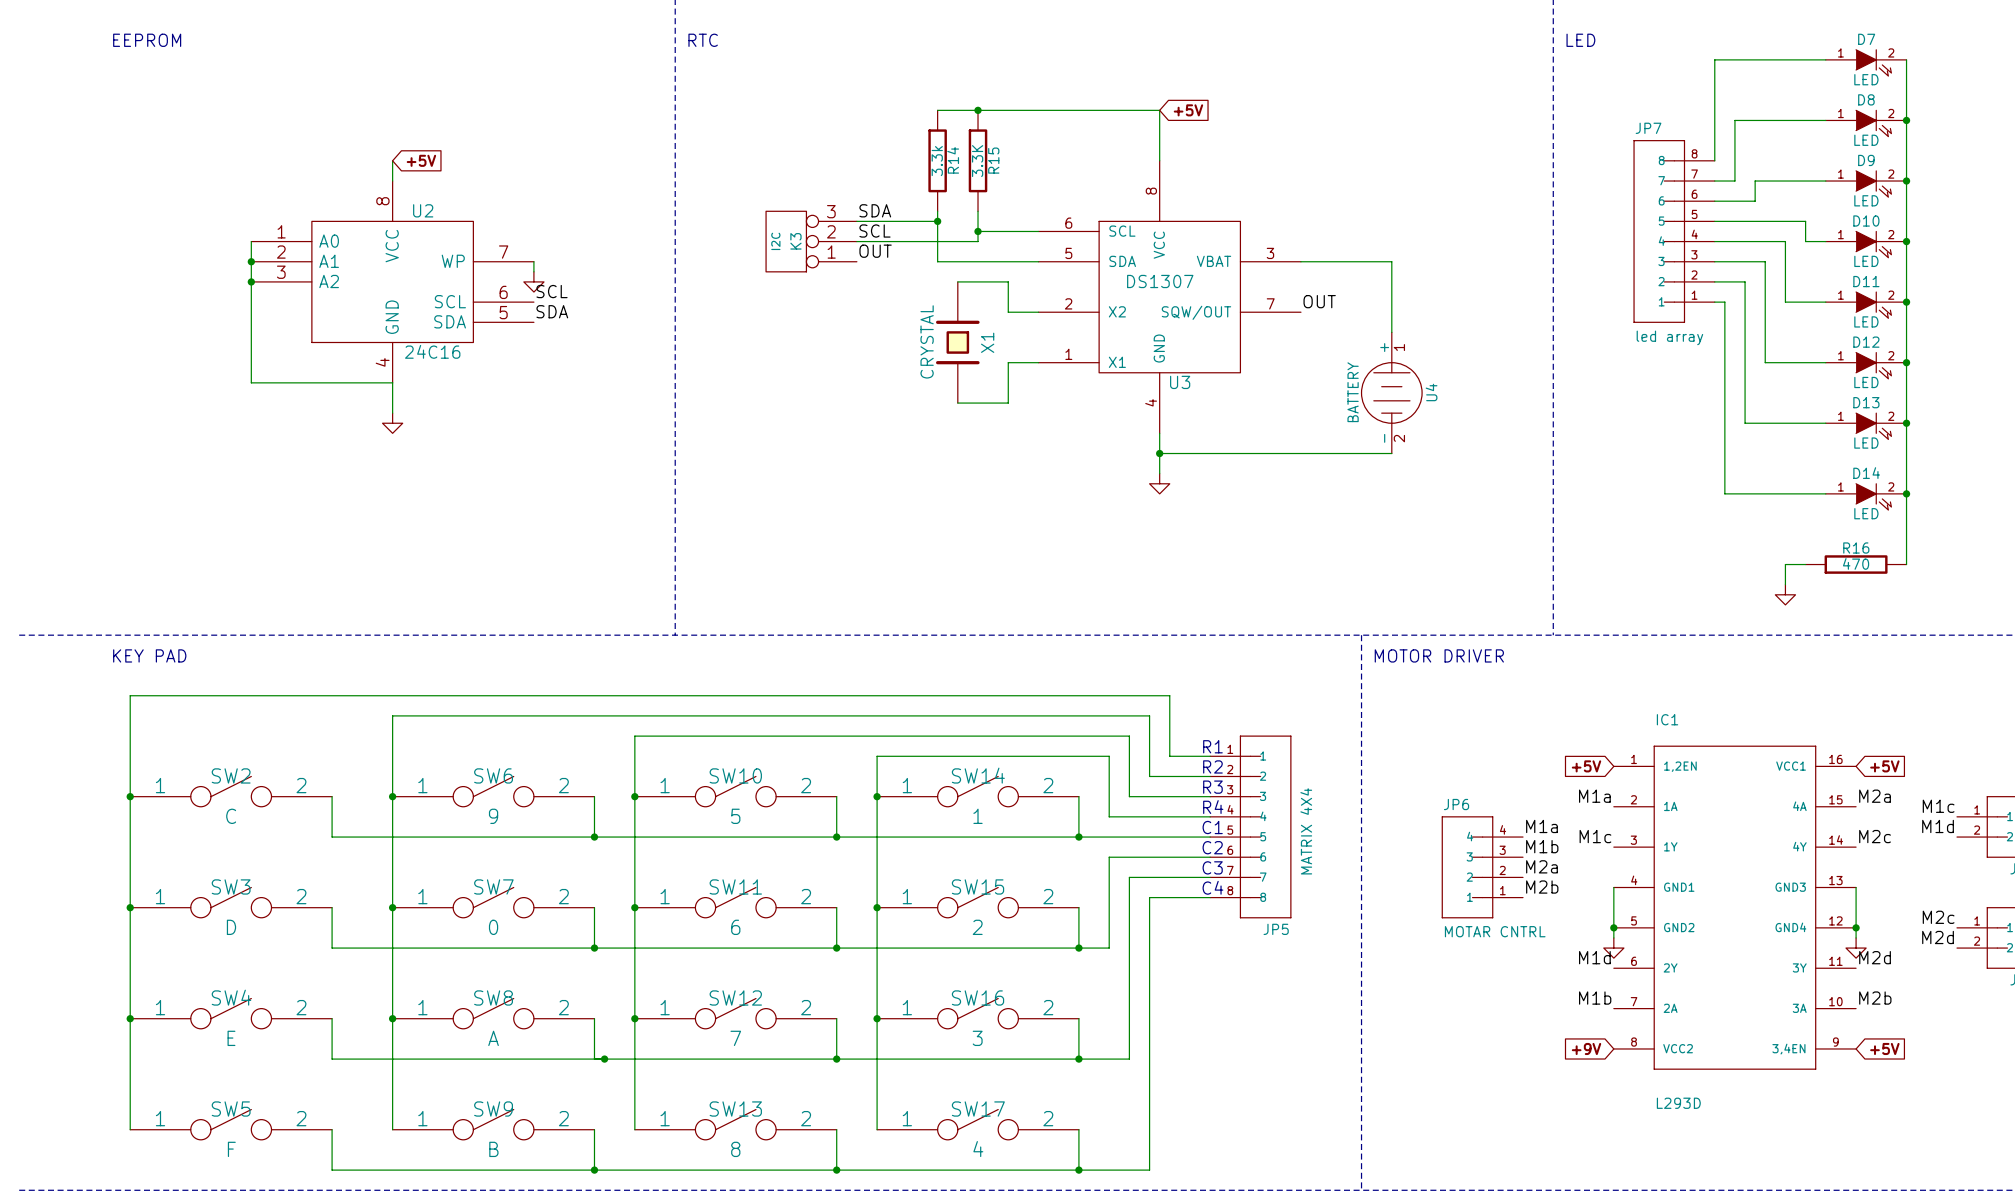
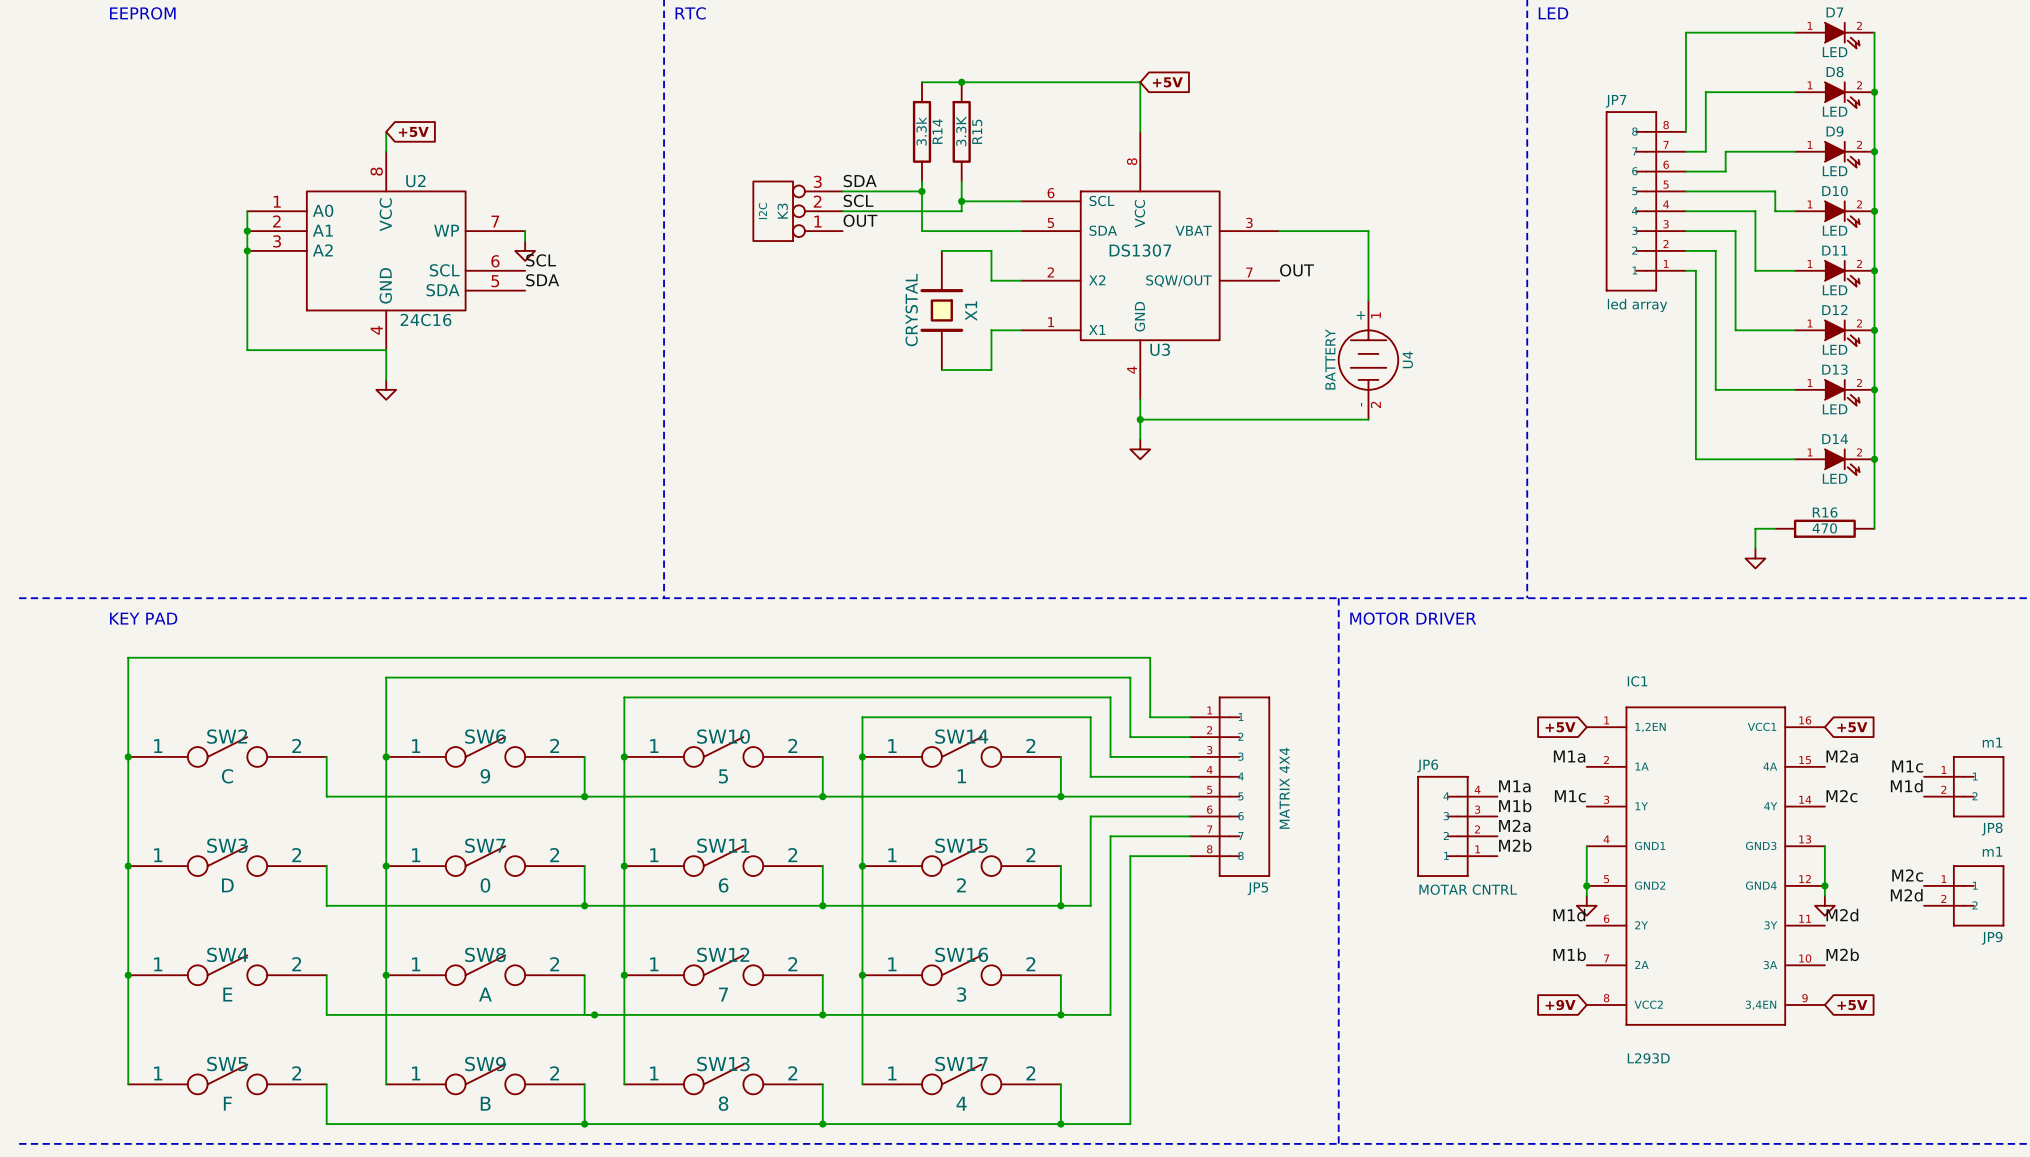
text: R1 (1212, 746) -> none
text: R2 (1212, 766) -> none
text: R3 (1212, 787) -> none
text: R4 (1213, 807) -> none
text: C1 (1212, 827) -> none
text: C2 (1212, 847) -> none
text: C3 (1212, 867) -> none
text: C4 (1212, 887) -> none

